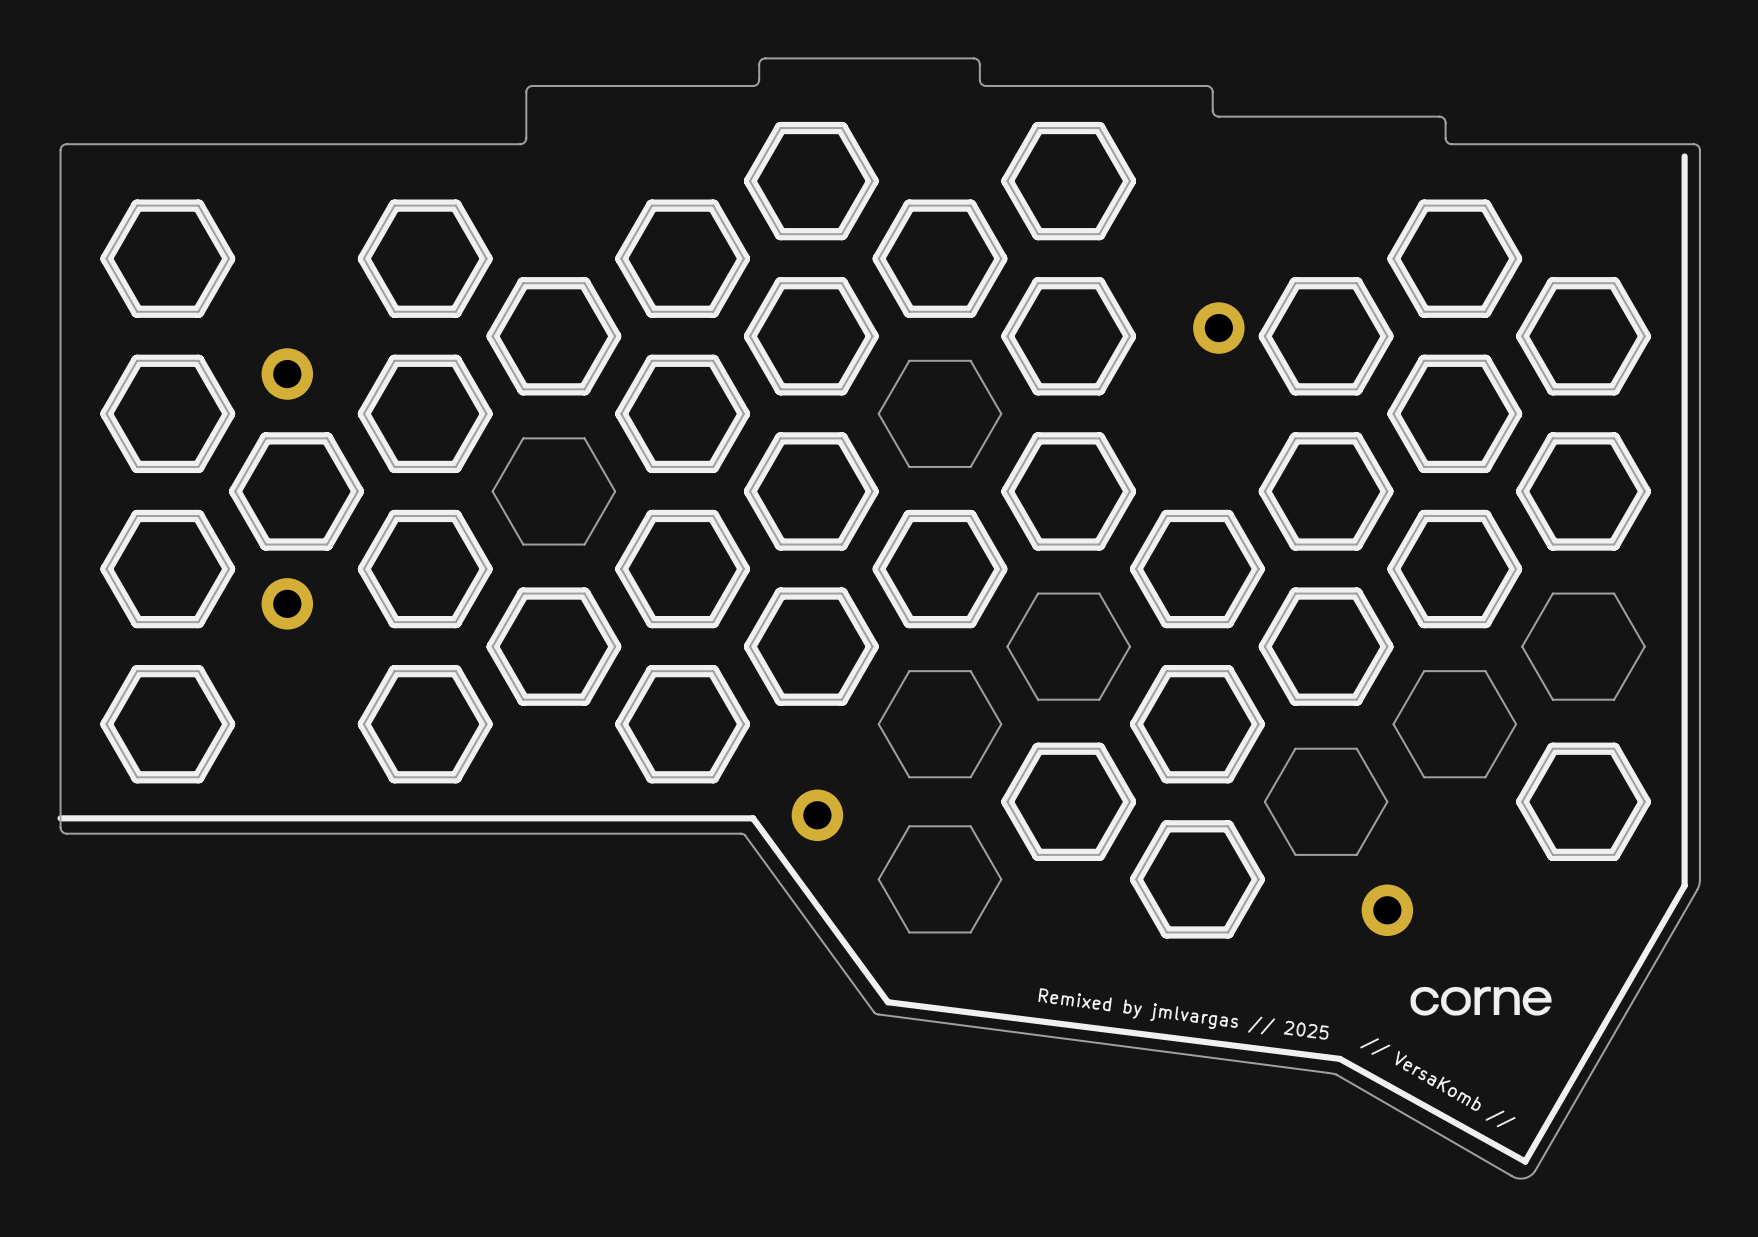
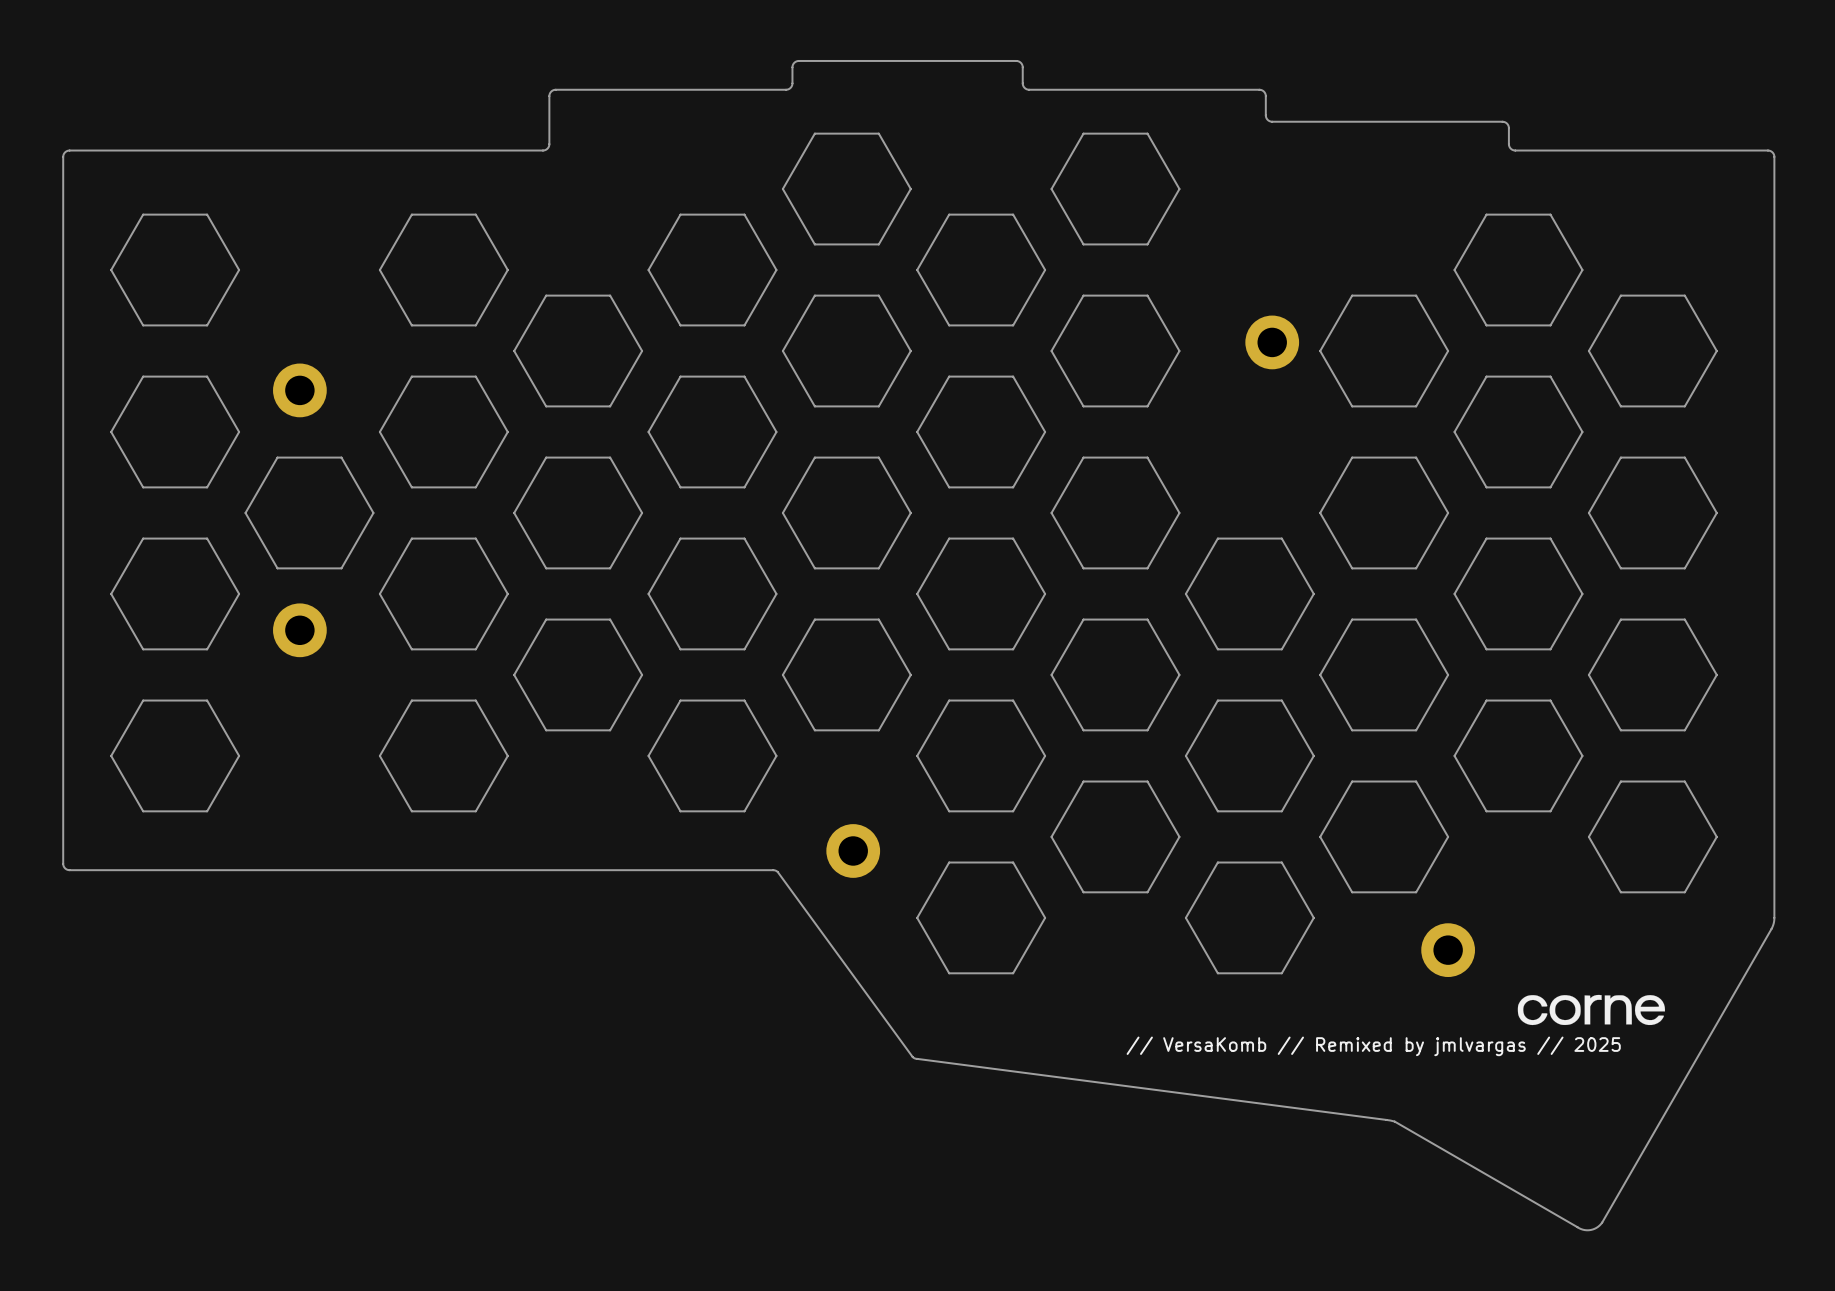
line: (780, 128) (841, 128) (872, 181) (841, 234) (780, 234) (750, 181) (780, 128) -> none
line: (1038, 128) (1099, 128) (1129, 181) (1099, 234) (1038, 234) (1007, 181) (1038, 128) -> none
line: (1684, 156) (1684, 885) (1525, 1161) (1339, 1058) (887, 1002) (753, 818) (60, 818) -> none
line: (137, 205) (198, 205) (229, 258) (198, 311) (137, 311) (106, 258) (137, 205) -> none
line: (394, 205) (455, 205) (486, 258) (455, 311) (394, 311) (363, 258) (394, 205) -> none
line: (651, 205) (713, 205) (743, 258) (713, 311) (651, 311) (621, 258) (651, 205) -> none
line: (909, 205) (970, 205) (1001, 258) (970, 311) (909, 311) (878, 258) (909, 205) -> none
line: (1424, 205) (1393, 258) (1424, 311) (1485, 311) (1516, 258) (1485, 205) (1424, 205) -> none
line: (523, 283) (584, 283) (615, 336) (584, 389) (523, 389) (492, 336) (523, 283) -> none
line: (780, 283) (841, 283) (872, 336) (841, 389) (780, 389) (750, 336) (780, 283) -> none
line: (1038, 283) (1099, 283) (1129, 336) (1099, 389) (1038, 389) (1007, 336) (1038, 283) -> none
line: (1295, 283) (1356, 283) (1387, 336) (1356, 389) (1295, 389) (1264, 336) (1295, 283) -> none
line: (1552, 283) (1614, 283) (1644, 336) (1614, 389) (1552, 389) (1522, 336) (1552, 283) -> none
line: (137, 360) (198, 360) (229, 413) (198, 466) (137, 466) (106, 413) (137, 360) -> none
line: (394, 360) (455, 360) (486, 413) (455, 466) (394, 466) (363, 413) (394, 360) -> none
line: (651, 360) (713, 360) (743, 413) (713, 466) (651, 466) (621, 413) (651, 360) -> none
line: (1424, 360) (1485, 360) (1516, 413) (1485, 466) (1424, 466) (1393, 413) (1424, 360) -> none
line: (265, 438) (235, 491) (265, 544) (327, 544) (357, 491) (327, 438) (265, 438) -> none
line: (780, 438) (841, 438) (872, 491) (841, 544) (780, 544) (750, 491) (780, 438) -> none
line: (1038, 438) (1007, 491) (1038, 544) (1099, 544) (1129, 491) (1099, 438) (1038, 438) -> none
line: (1295, 438) (1356, 438) (1387, 491) (1356, 544) (1295, 544) (1264, 491) (1295, 438) -> none
line: (1552, 438) (1614, 438) (1644, 491) (1614, 544) (1552, 544) (1522, 491) (1552, 438) -> none
line: (137, 515) (198, 515) (229, 569) (198, 622) (137, 622) (106, 569) (137, 515) -> none
line: (394, 515) (455, 515) (486, 569) (455, 622) (394, 622) (363, 569) (394, 515) -> none
line: (651, 515) (713, 515) (743, 569) (713, 622) (651, 622) (621, 569) (651, 515) -> none
line: (909, 515) (970, 515) (1001, 569) (970, 622) (909, 622) (878, 569) (909, 515) -> none
line: (1166, 515) (1136, 569) (1166, 622) (1228, 622) (1258, 569) (1228, 515) (1166, 515) -> none
line: (1424, 515) (1485, 515) (1516, 569) (1485, 622) (1424, 622) (1393, 569) (1424, 515) -> none
line: (523, 593) (584, 593) (615, 646) (584, 699) (523, 699) (492, 646) (523, 593) -> none
line: (780, 593) (841, 593) (872, 646) (841, 699) (780, 699) (750, 646) (780, 593) -> none
line: (1295, 593) (1356, 593) (1387, 646) (1356, 699) (1295, 699) (1264, 646) (1295, 593) -> none
line: (137, 671) (198, 671) (229, 724) (198, 777) (137, 777) (106, 724) (137, 671) -> none
line: (394, 671) (455, 671) (486, 724) (455, 777) (394, 777) (363, 724) (394, 671) -> none
line: (651, 671) (713, 671) (743, 724) (713, 777) (651, 777) (621, 724) (651, 671) -> none
line: (1166, 671) (1228, 671) (1258, 724) (1228, 777) (1166, 777) (1136, 724) (1166, 671) -> none
line: (1038, 748) (1007, 801) (1038, 854) (1099, 854) (1129, 801) (1099, 748) (1038, 748) -> none
line: (1552, 748) (1522, 801) (1552, 854) (1614, 854) (1644, 801) (1614, 748) (1552, 748) -> none
line: (1166, 826) (1136, 879) (1166, 932) (1228, 932) (1258, 879) (1228, 826) (1166, 826) -> none
drawing position: (1481, 1001) -> (1591, 1009)
text: Remixed by jmlvargas // 2025 (1183, 1013) -> // VersaKomb // Remixed by jmlvargas // 2025 (1373, 1046)
text: // VersaKomb // (1437, 1082) -> none

